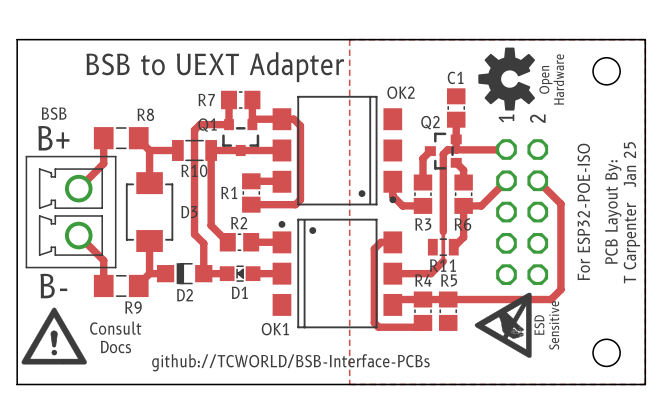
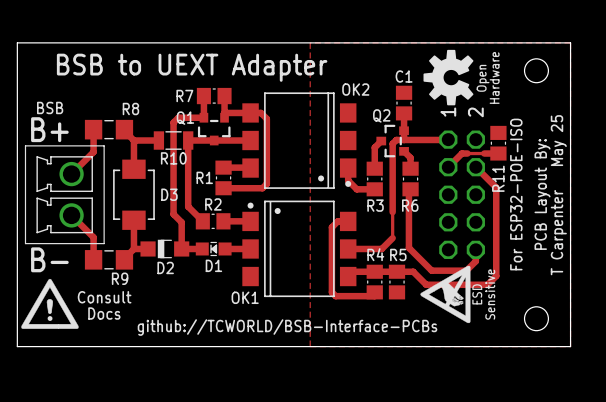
track: (506, 180) (481, 205) (463, 205) (463, 237) (453, 247) -> (448, 167) (461, 153) (498, 153)
track: none -> (408, 189) (408, 247) (431, 270) (466, 270) (475, 261) (475, 249)
text: T Carpenter Jan 25 (631, 212) -> T Carpenter May 25 (558, 195)
R11 footprint: [427, 238, 459, 256] -> [490, 125, 507, 161]
track: (560, 289) (551, 299) (466, 299) -> (496, 263) (496, 276) (487, 284) (426, 284) (413, 271)

